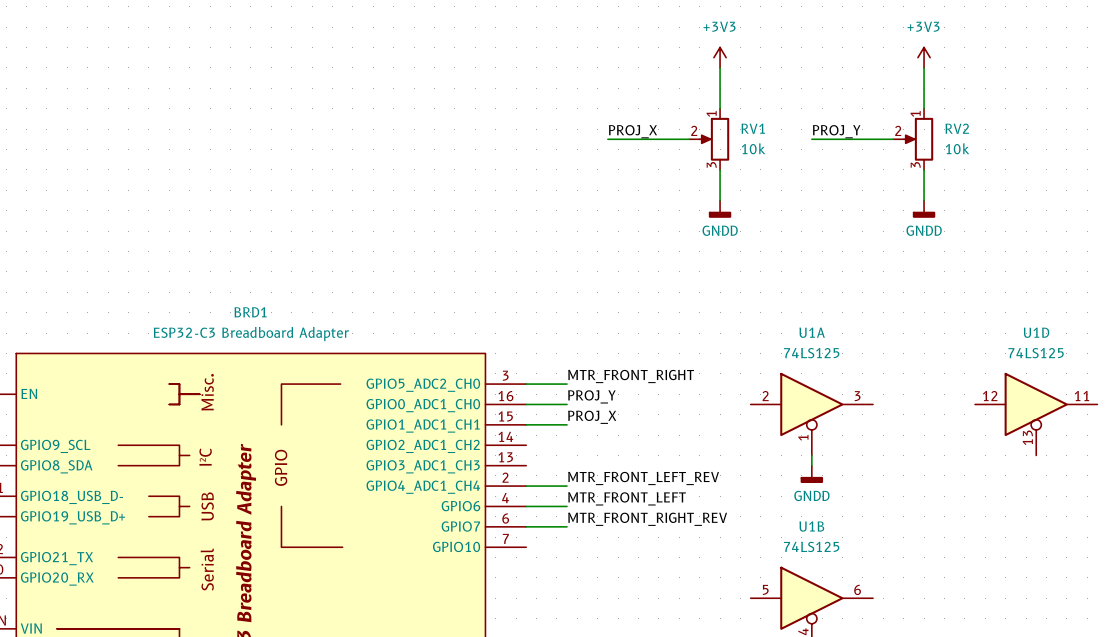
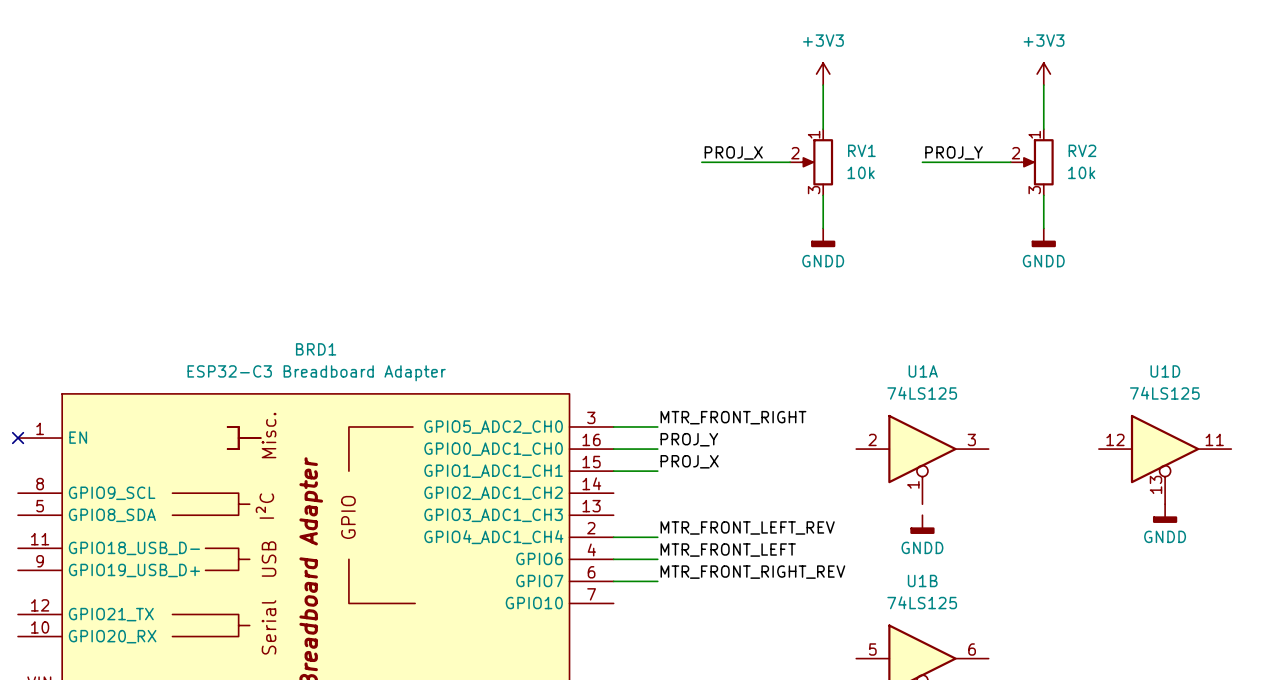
wire: (811, 455) (811, 465) -> none
power symbol: none -> GNDD (1165, 513)

